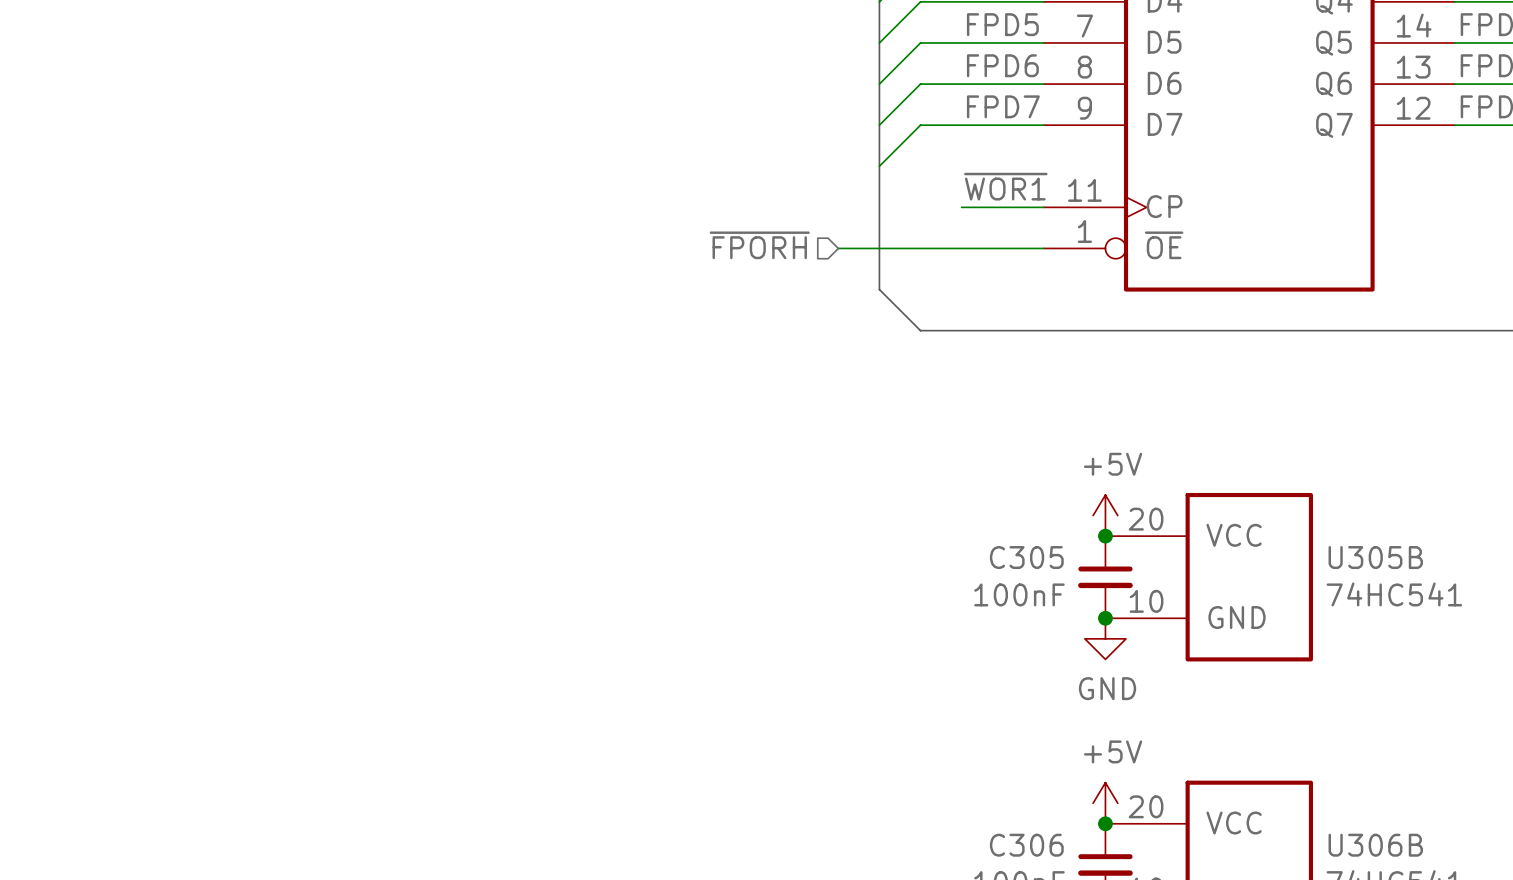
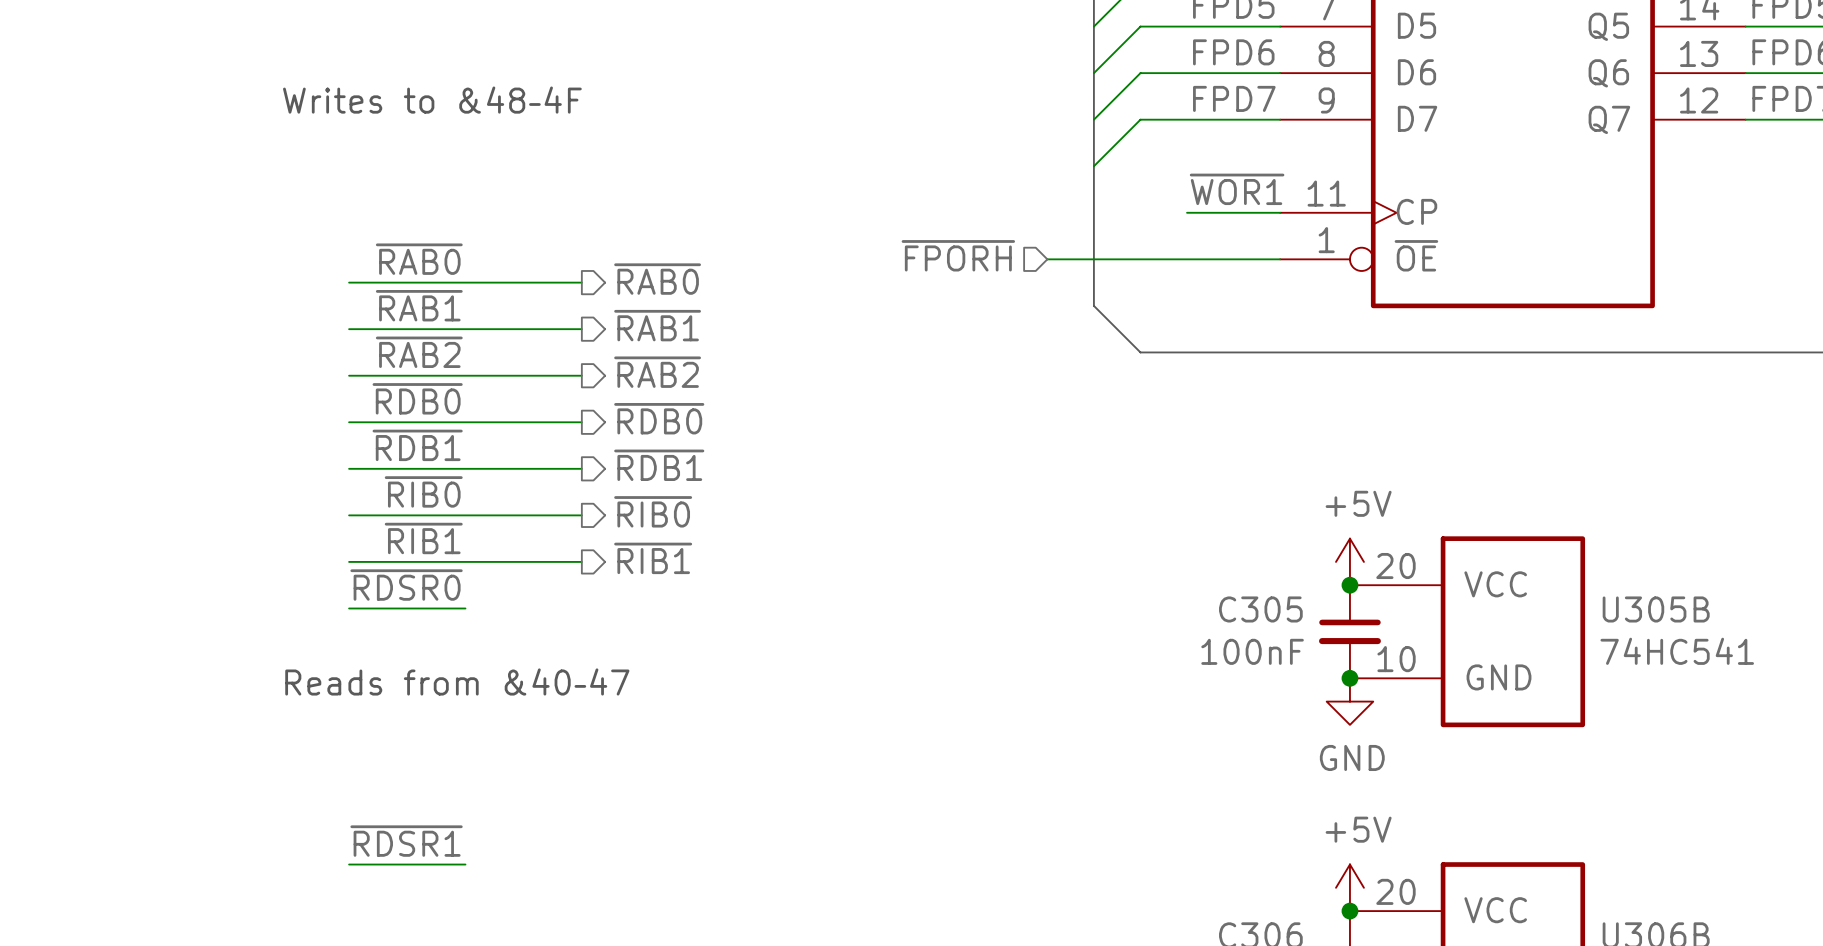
text: none -> Writes to &48–4F (432, 100)
label: none -> ~{RAB0} (419, 259)
hierarchical label: none -> ~{RAB0} (657, 279)
wire: none -> (349, 282) (581, 282)
label: none -> ~{RAB1} (419, 305)
hierarchical label: none -> ~{RAB1} (657, 325)
wire: none -> (349, 329) (581, 329)
label: none -> ~{RAB2} (419, 352)
hierarchical label: none -> ~{RAB2} (657, 372)
wire: none -> (349, 375) (581, 375)
label: none -> ~{RDB0} (417, 398)
hierarchical label: none -> ~{RDB0} (659, 418)
wire: none -> (349, 422) (581, 422)
label: none -> ~{RDB1} (417, 445)
hierarchical label: none -> ~{RDB1} (659, 465)
wire: none -> (349, 468) (581, 468)
label: none -> ~{RIB0} (423, 491)
hierarchical label: none -> ~{RIB0} (653, 511)
wire: none -> (349, 515) (581, 515)
label: none -> ~{RIB1} (423, 538)
hierarchical label: none -> ~{RIB1} (653, 558)
wire: none -> (349, 561) (581, 561)
label: none -> ~{RDSR0} (406, 585)
wire: none -> (349, 608) (465, 608)
text: none -> Reads from &40–47 (457, 681)
label: none -> ~{RDSR1} (406, 841)
wire: none -> (349, 864) (465, 864)

